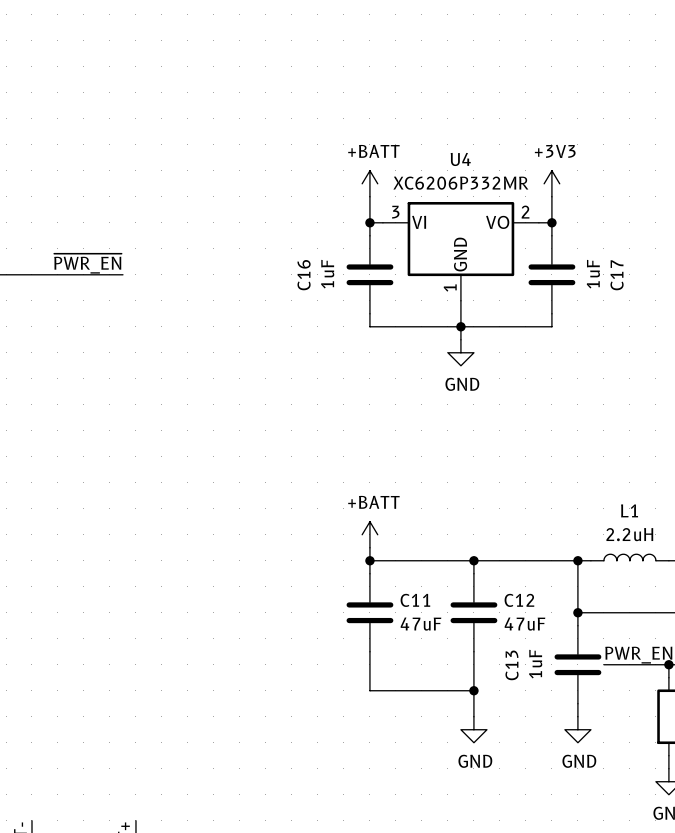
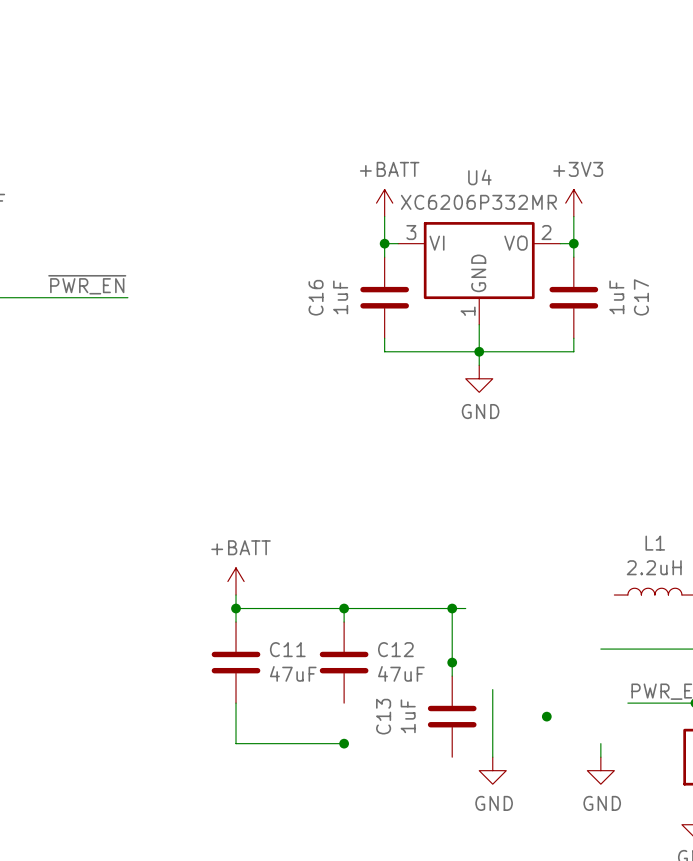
power symbol position: +BATT (369, 534) -> +BATT (236, 581)
wire: (369, 547) (369, 573) -> (236, 595) (236, 622)
wire: (369, 560) (590, 560) -> (236, 608) (465, 608)
junction: (369, 560) -> none
wire: (473, 560) (473, 573) -> (344, 608) (344, 622)
junction: (473, 560) -> none
wire: (577, 560) (577, 625) -> (452, 608) (452, 676)
junction: (577, 560) -> none
junction: none -> (236, 608)
junction: none -> (344, 608)
junction: none -> (452, 608)
C11 position: (369, 612) -> (236, 662)
C12 position: (473, 612) -> (344, 662)
junction: (577, 612) -> none
junction: none -> (452, 662)
wire: (369, 651) (369, 690) (473, 690) -> (236, 703) (236, 743) (344, 743)
C13 position: (577, 664) -> (452, 716)
junction: none -> (546, 716)
junction: (473, 690) -> none
junction: none -> (344, 743)

